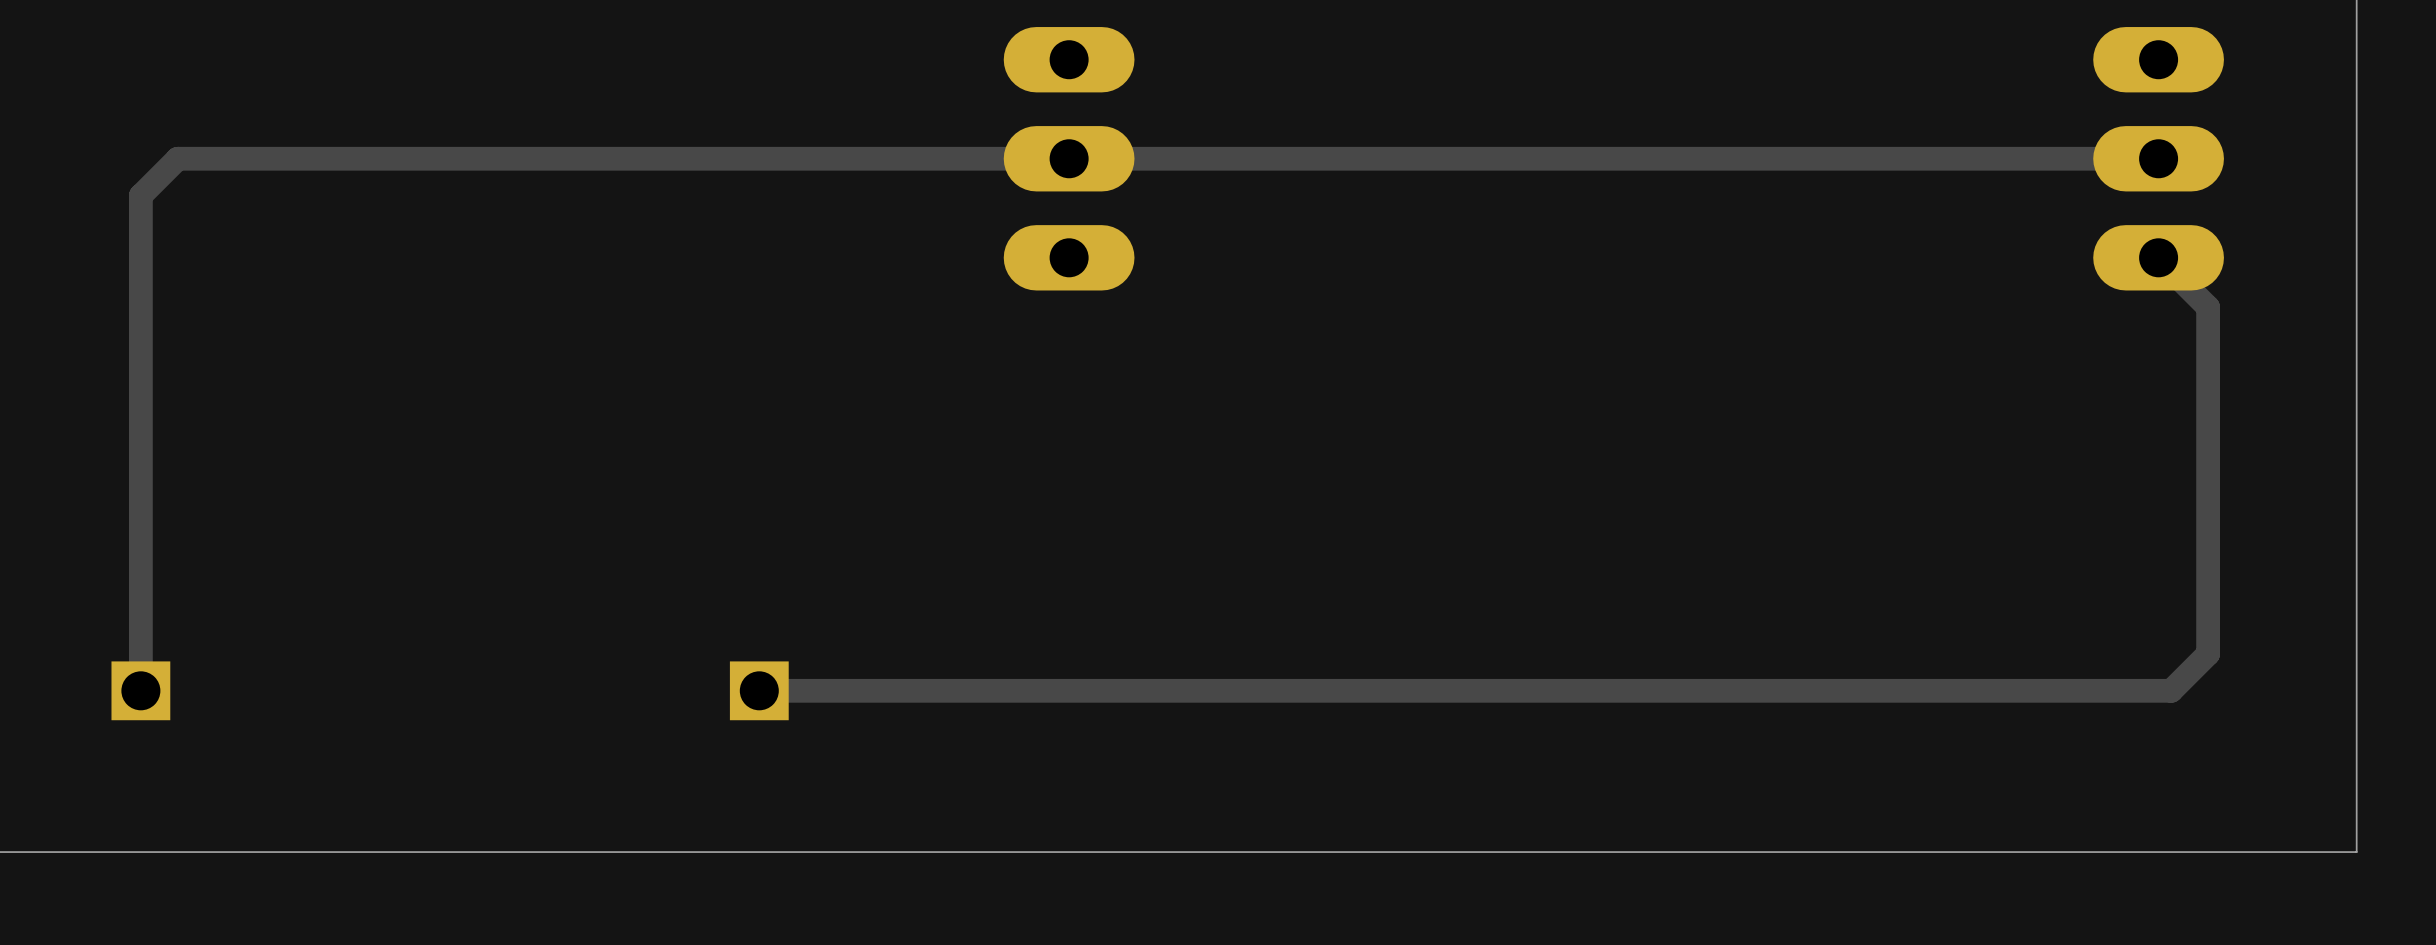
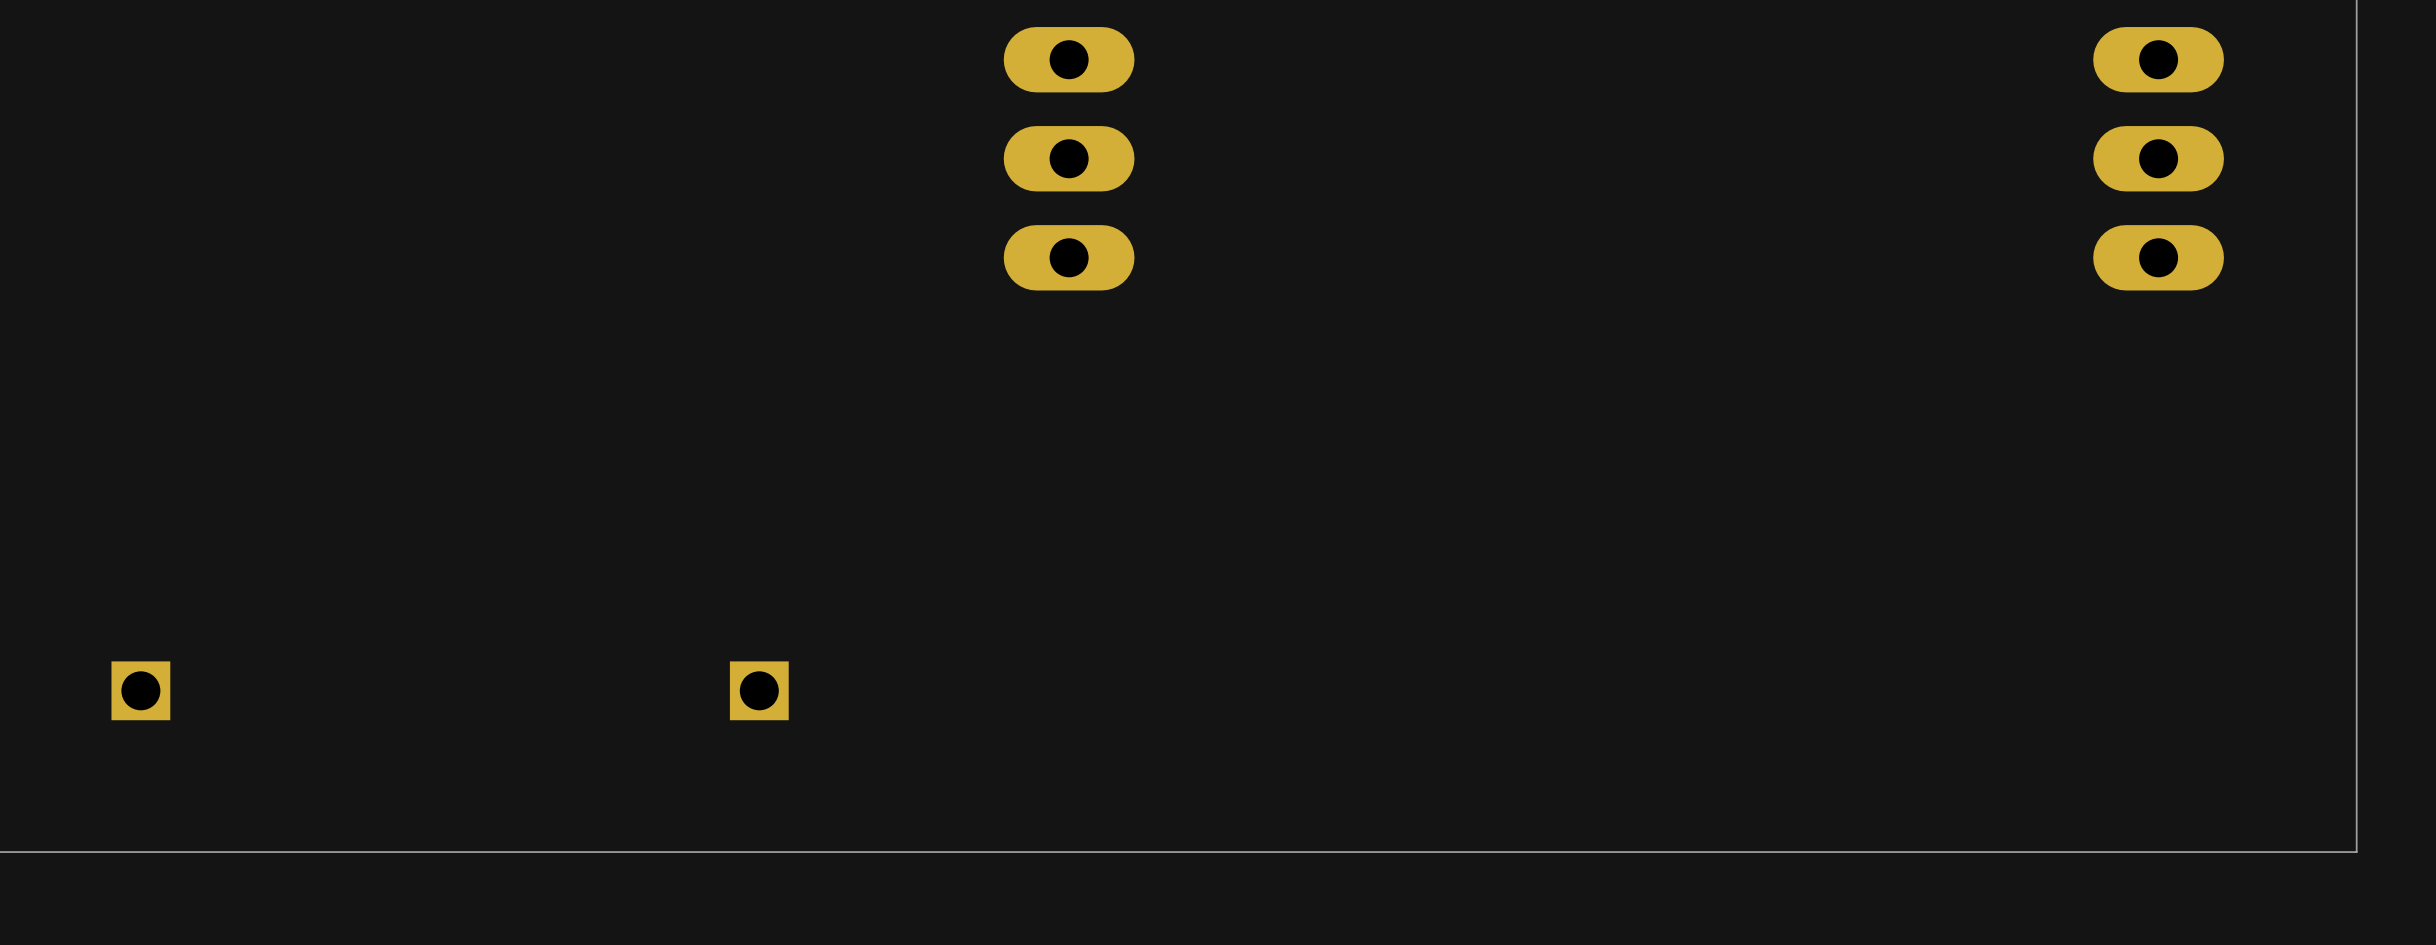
track: (2158, 158) (177, 158) (140, 195) (140, 690) -> none
track: (2158, 257) (2208, 307) (2208, 653) (2171, 690) (759, 690) -> none

